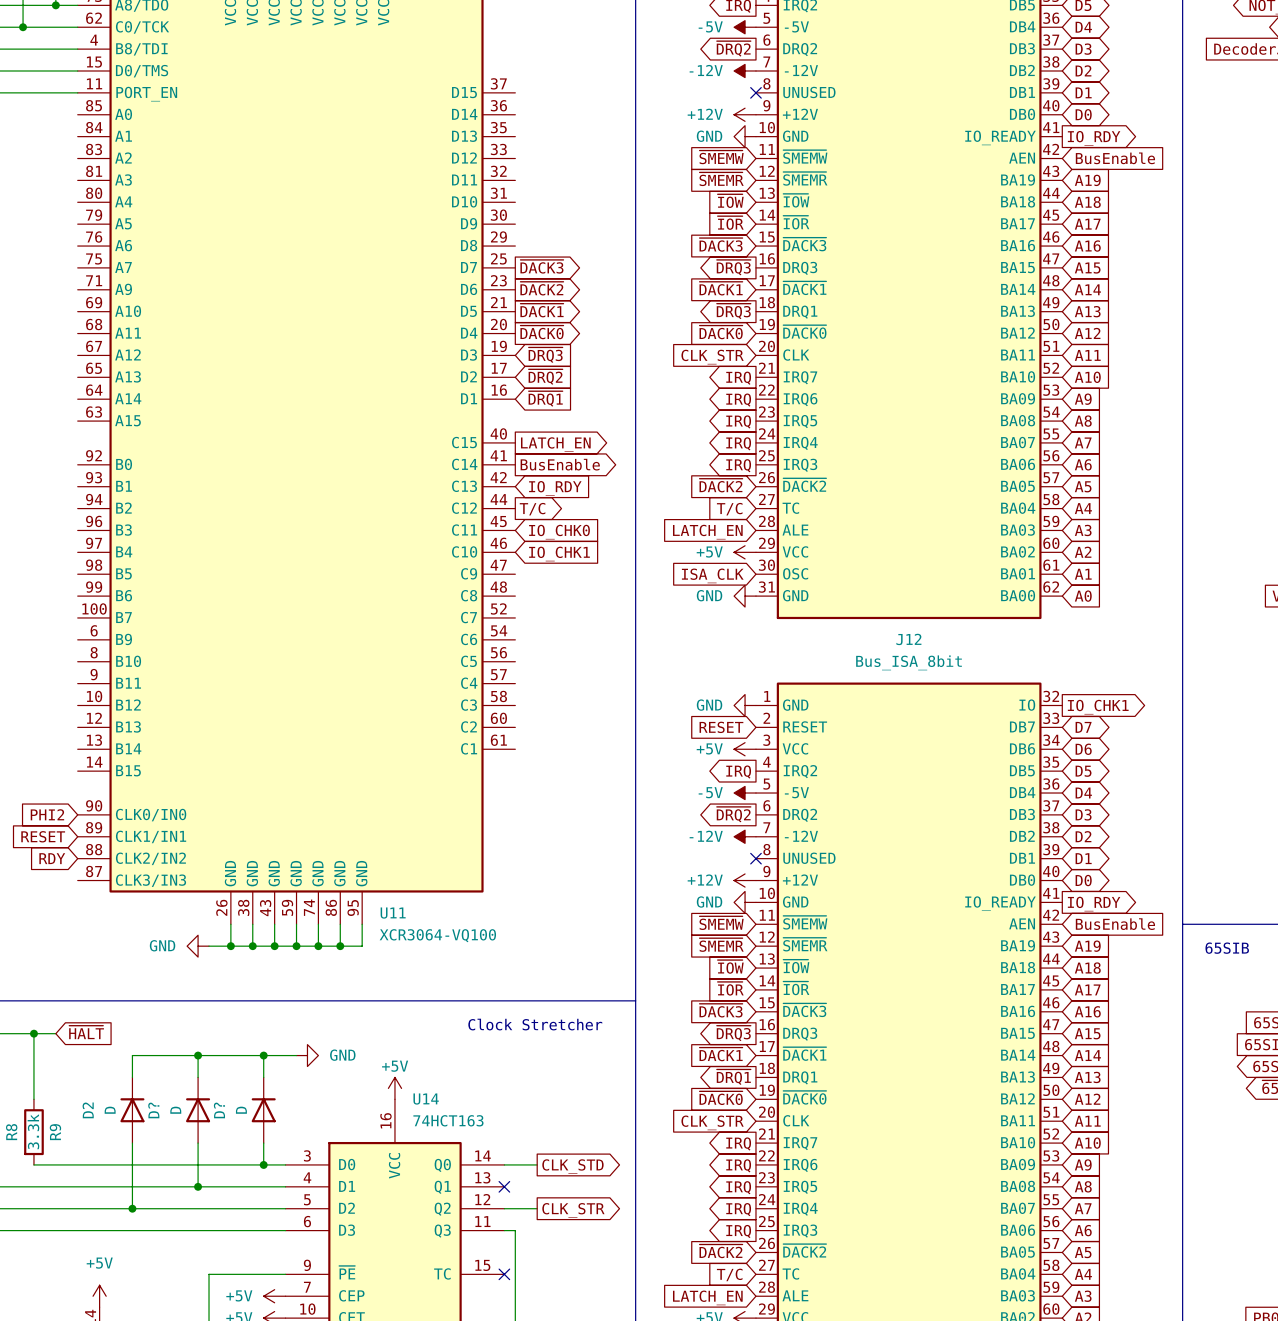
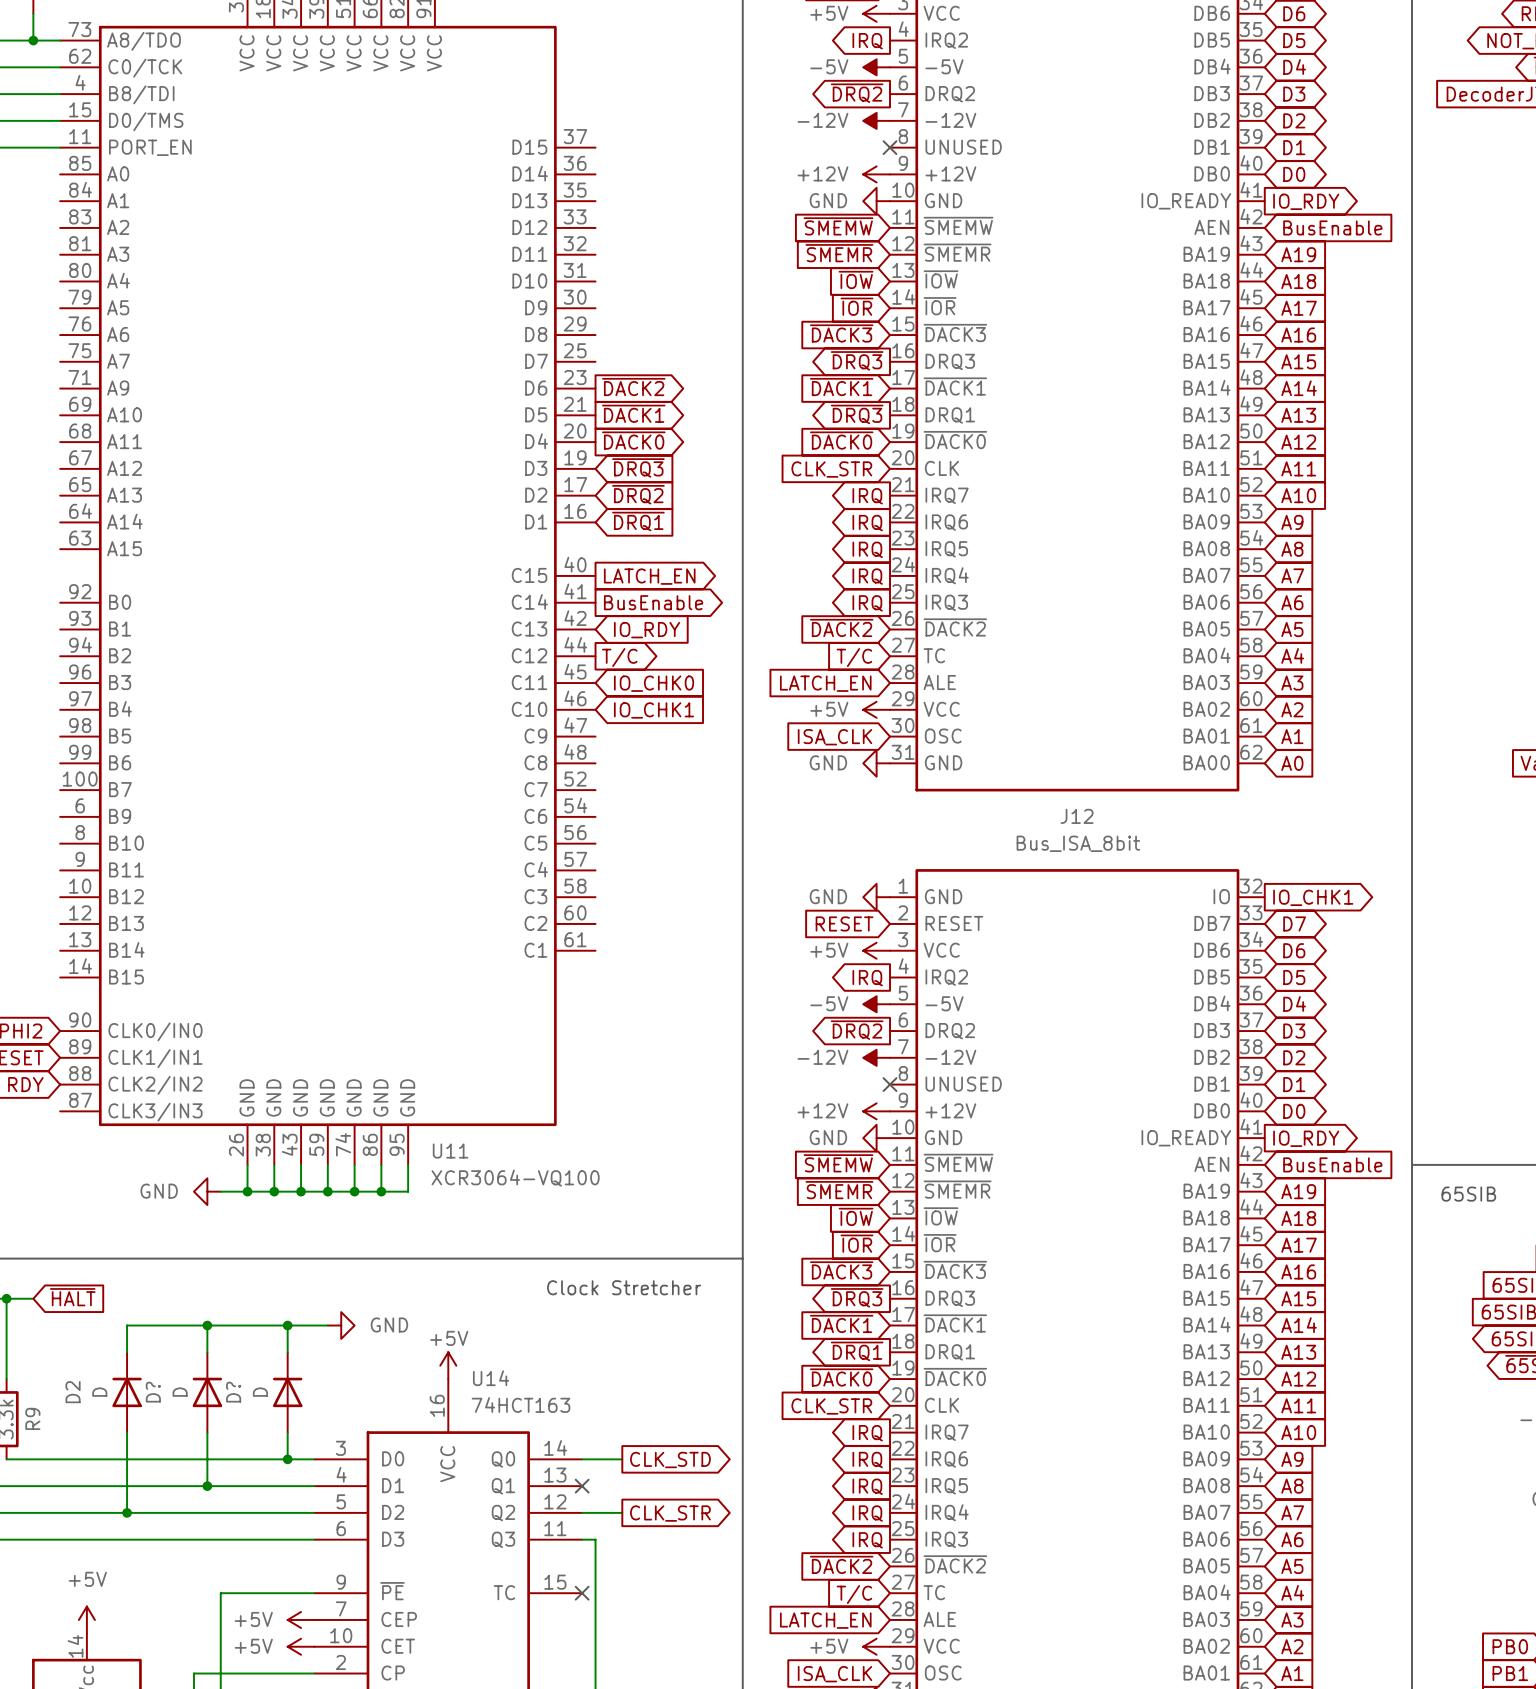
global label: ~{DACK3} (541, 266) -> none

